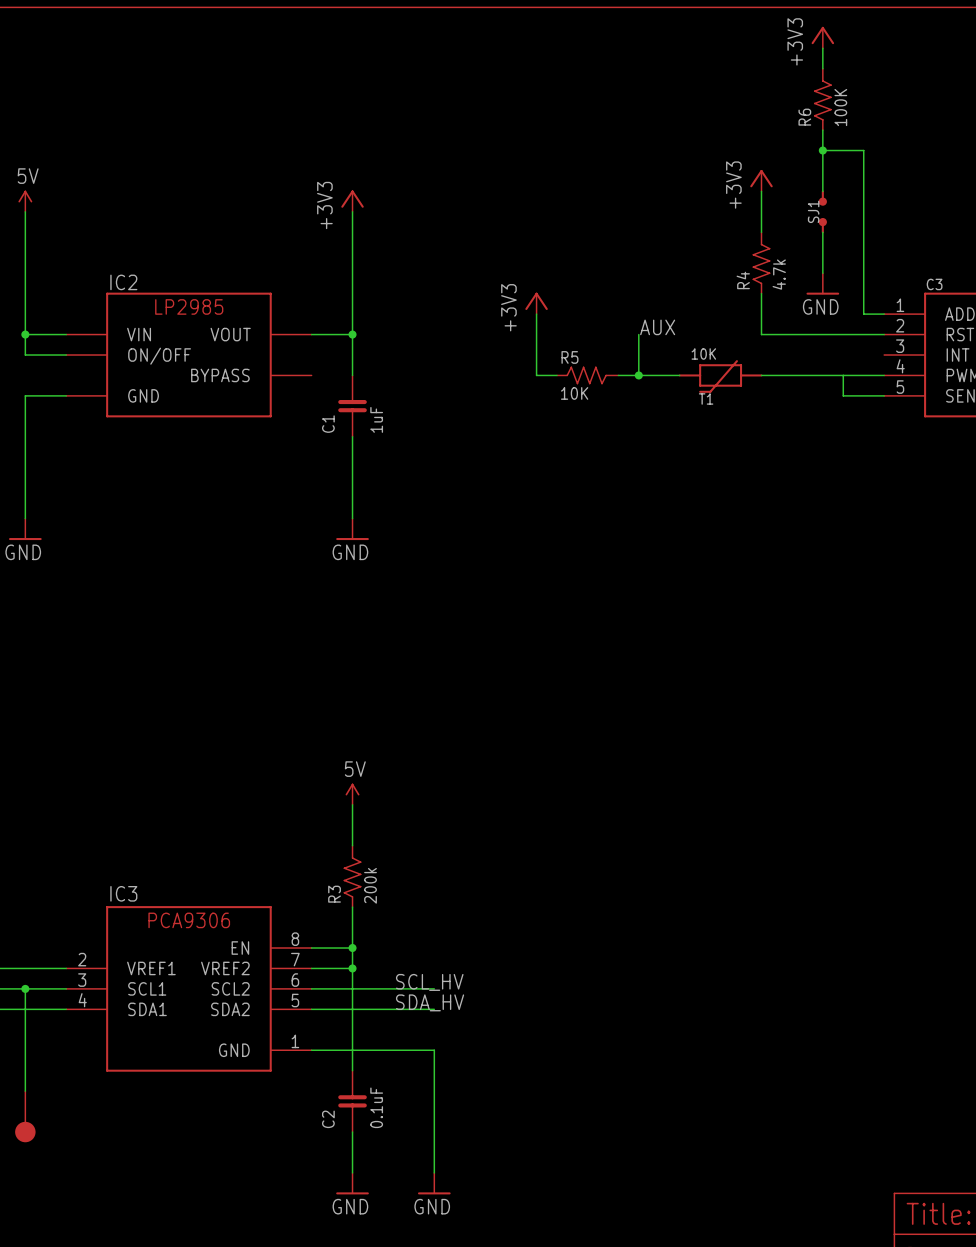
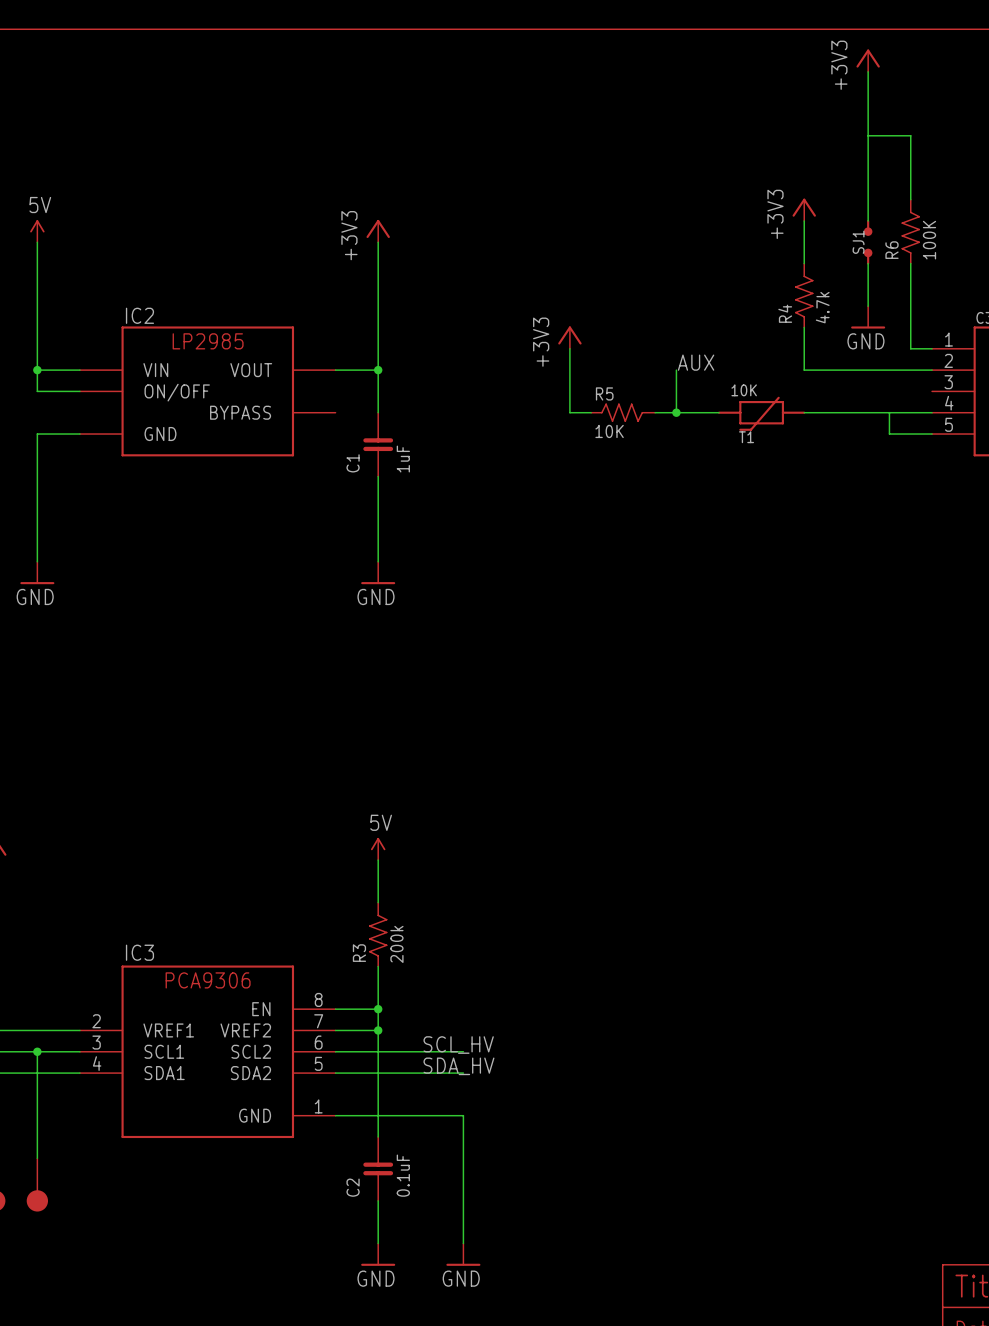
R6 position: (822, 99) -> (910, 231)
wire: (822, 150) (863, 150) -> (868, 135) (910, 135) (910, 178)
junction: (822, 150) -> none

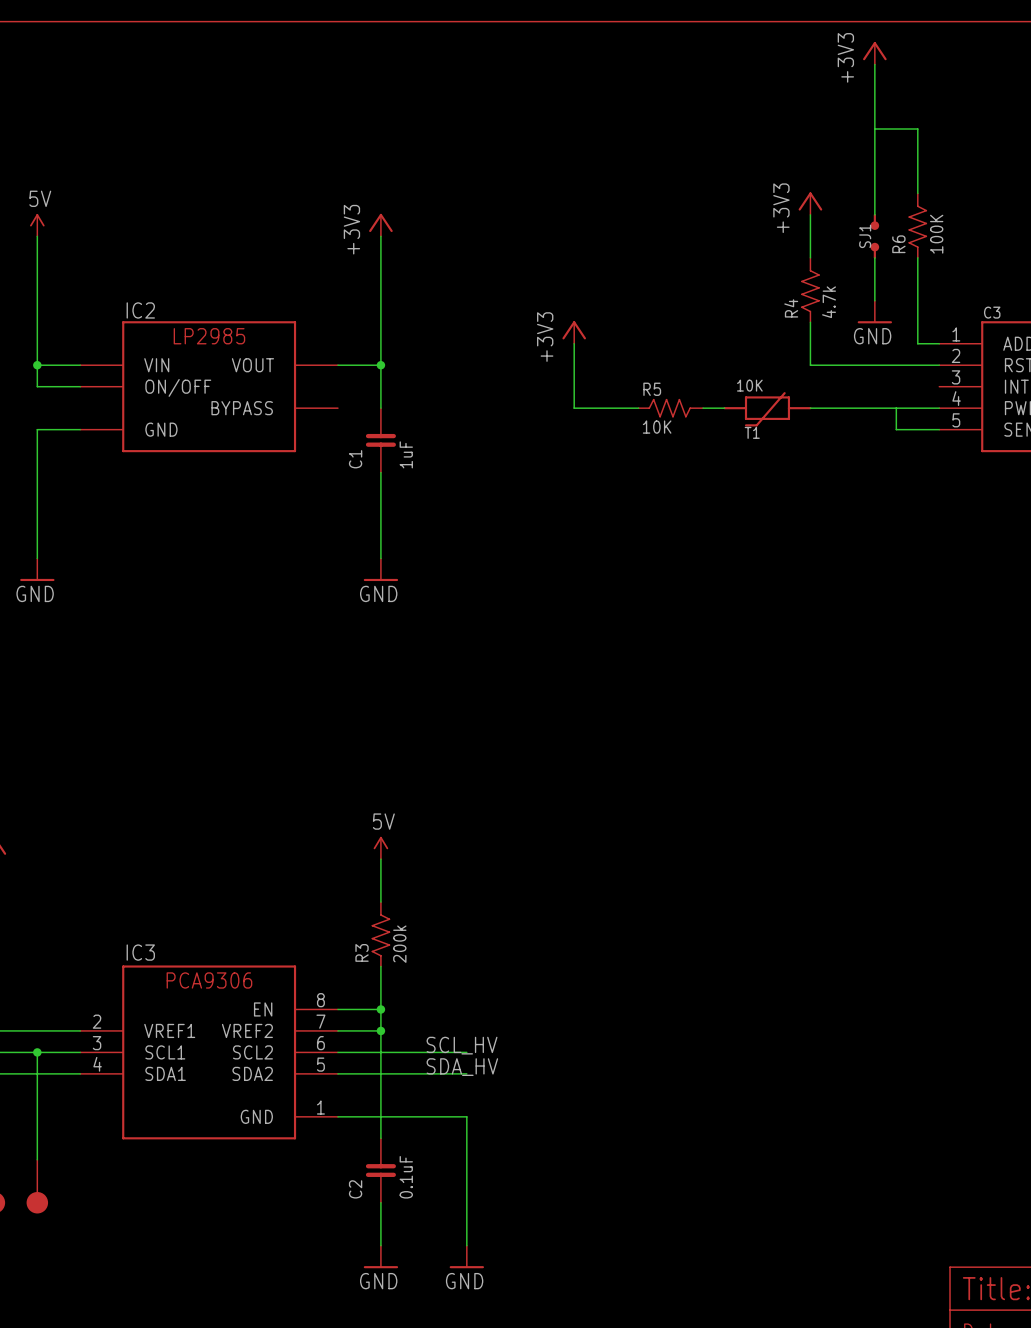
label: AUX (696, 362) -> none
wire: (676, 370) (676, 412) -> none
R5 position: (623, 412) -> (670, 408)
wire: (655, 412) (697, 412) -> (595, 408) (638, 408)
junction: (676, 412) -> none

